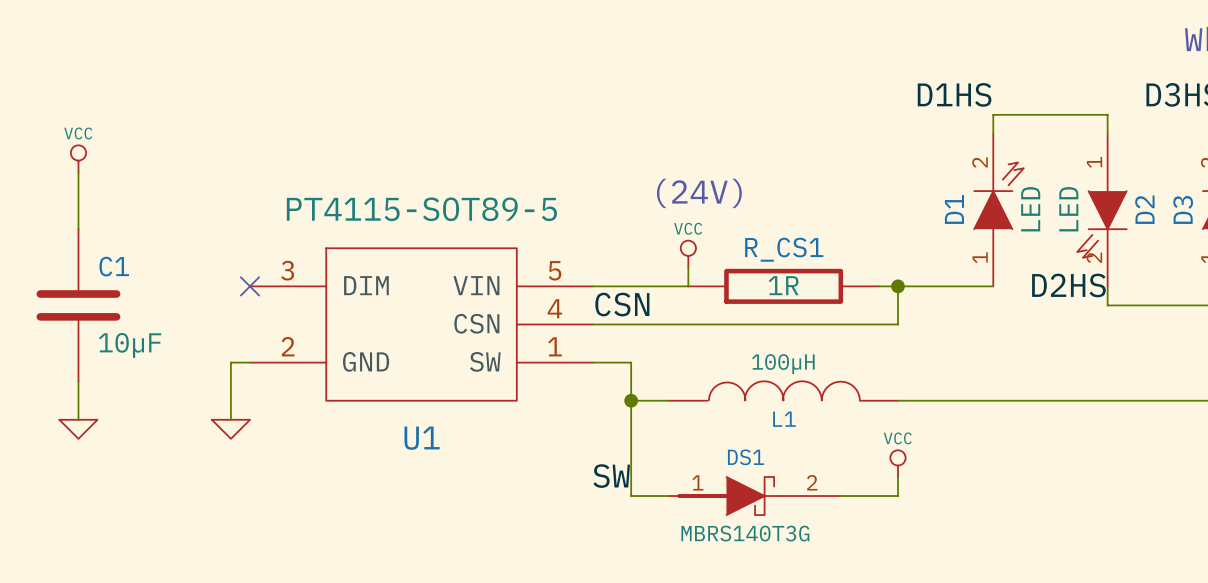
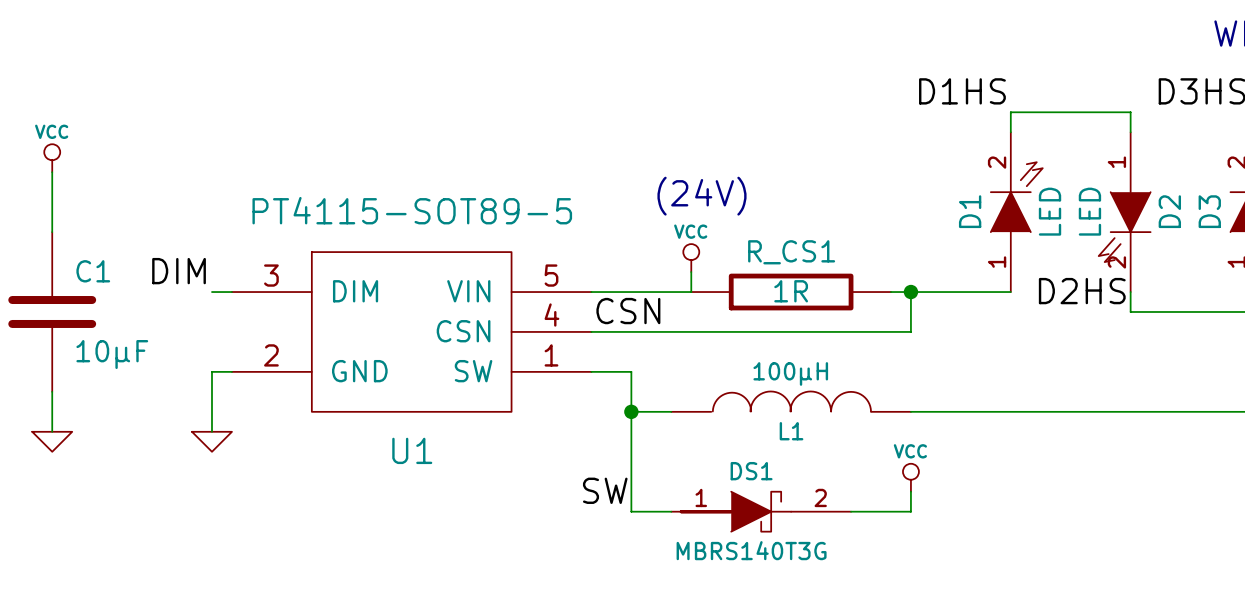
label: none -> DIM (179, 271)
wire: none -> (211, 292) (231, 292)
no-connect mark: (250, 286) -> none

